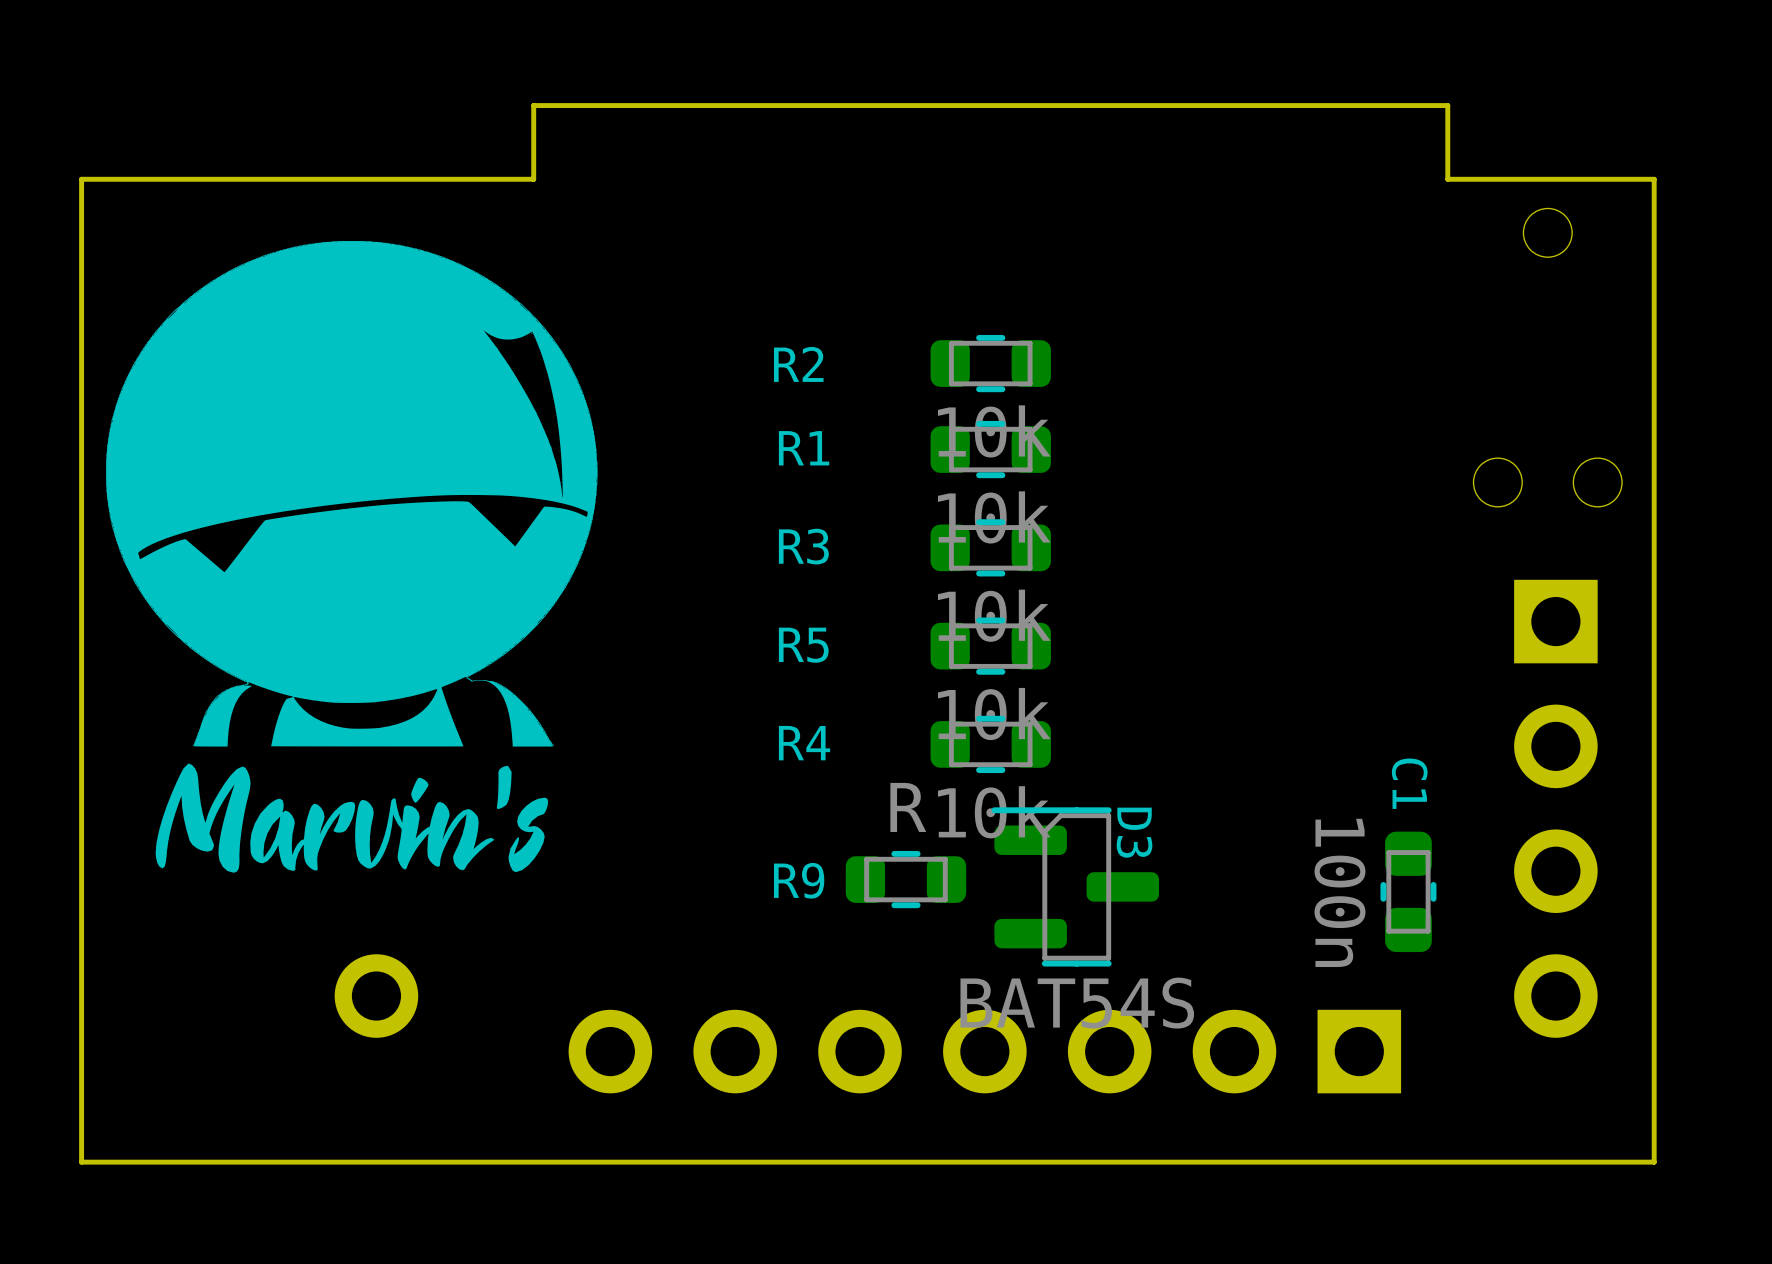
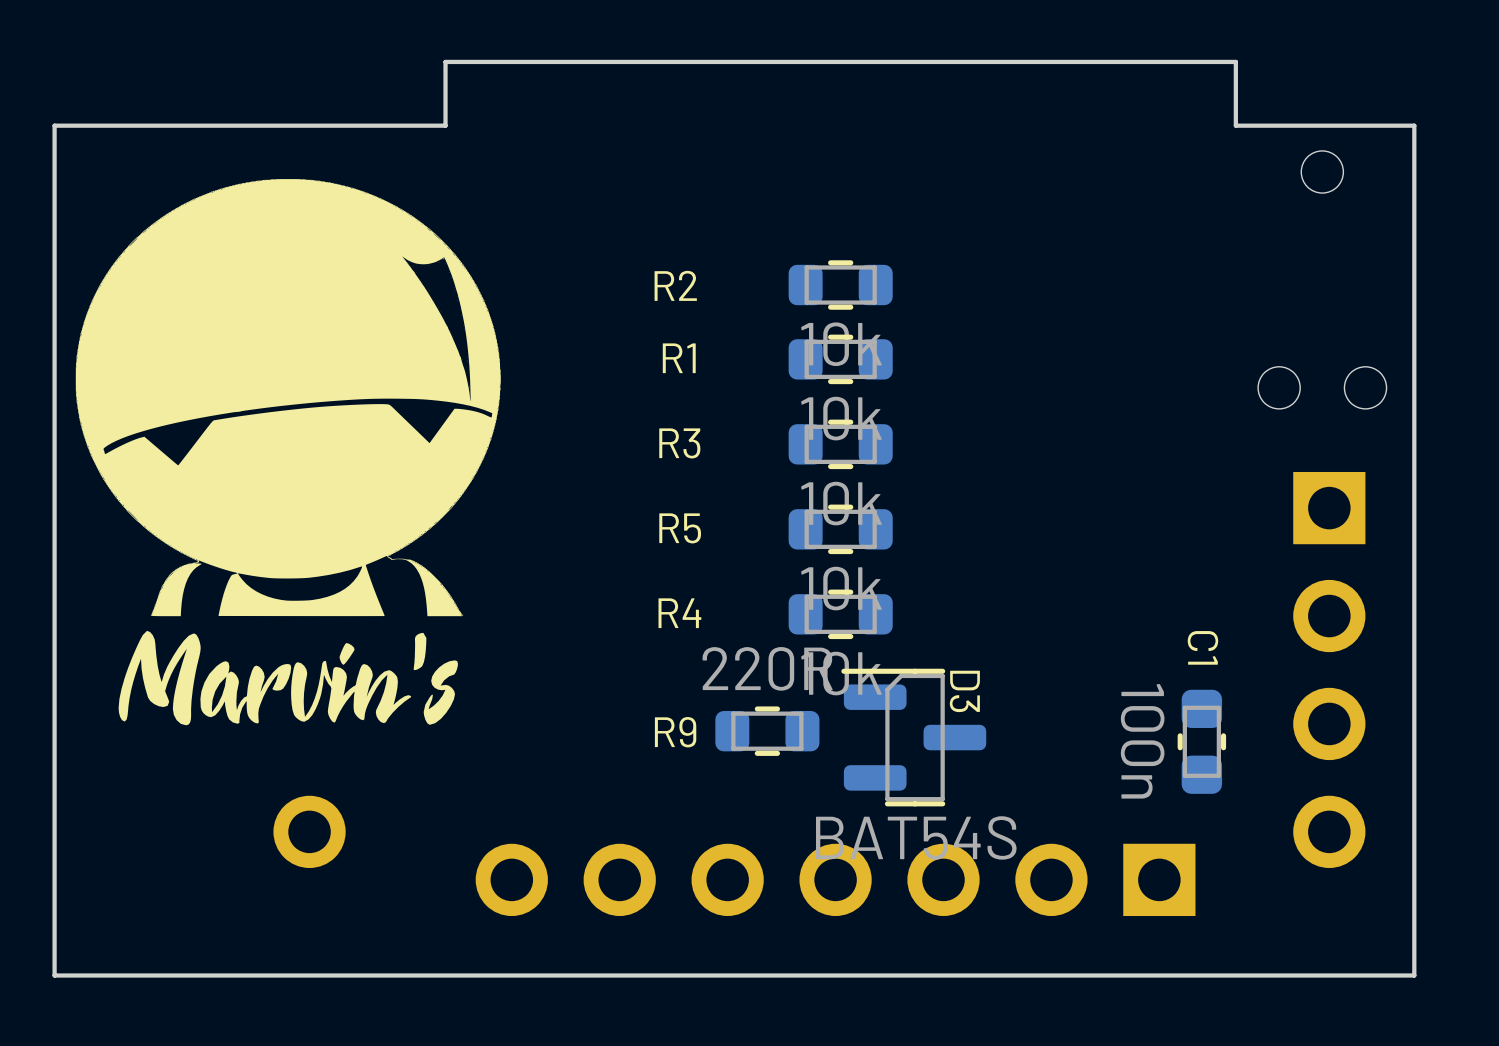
R9 value: R (908, 807) -> 220R (767, 668)

